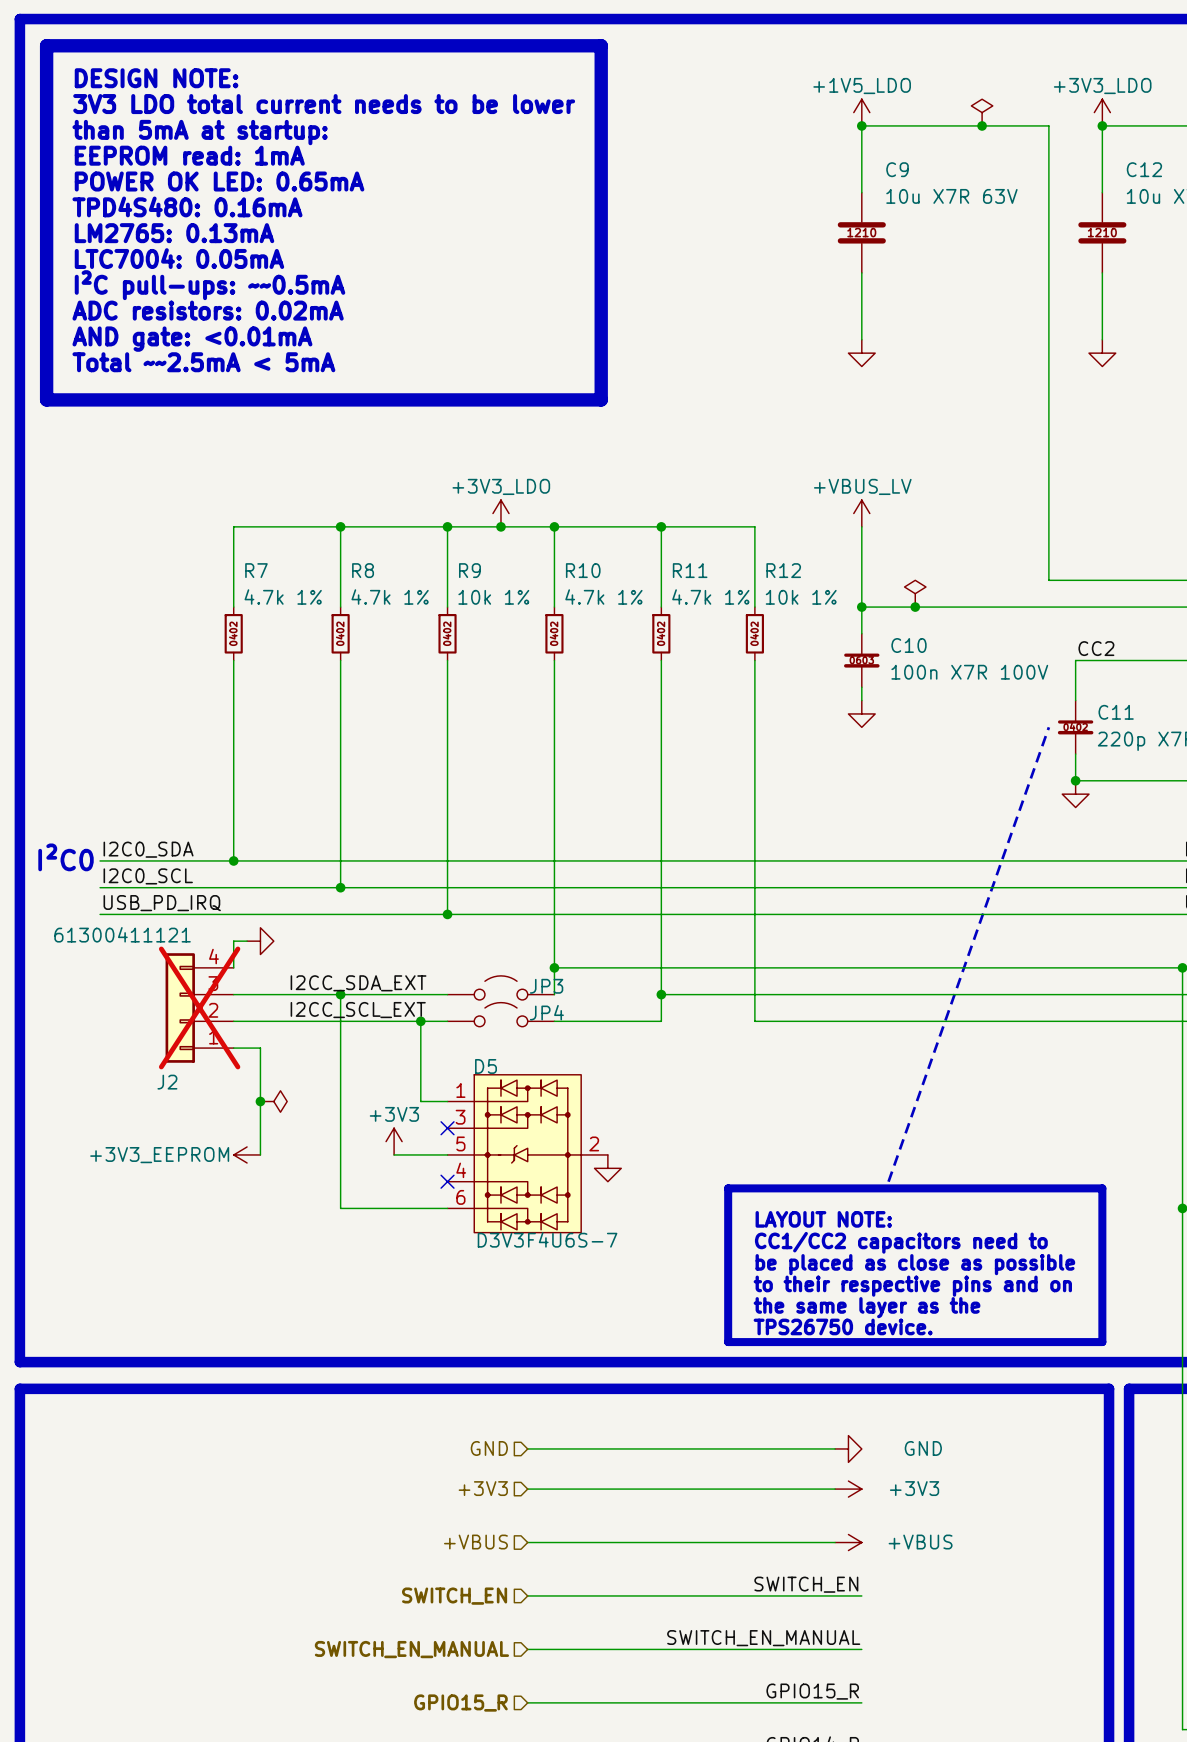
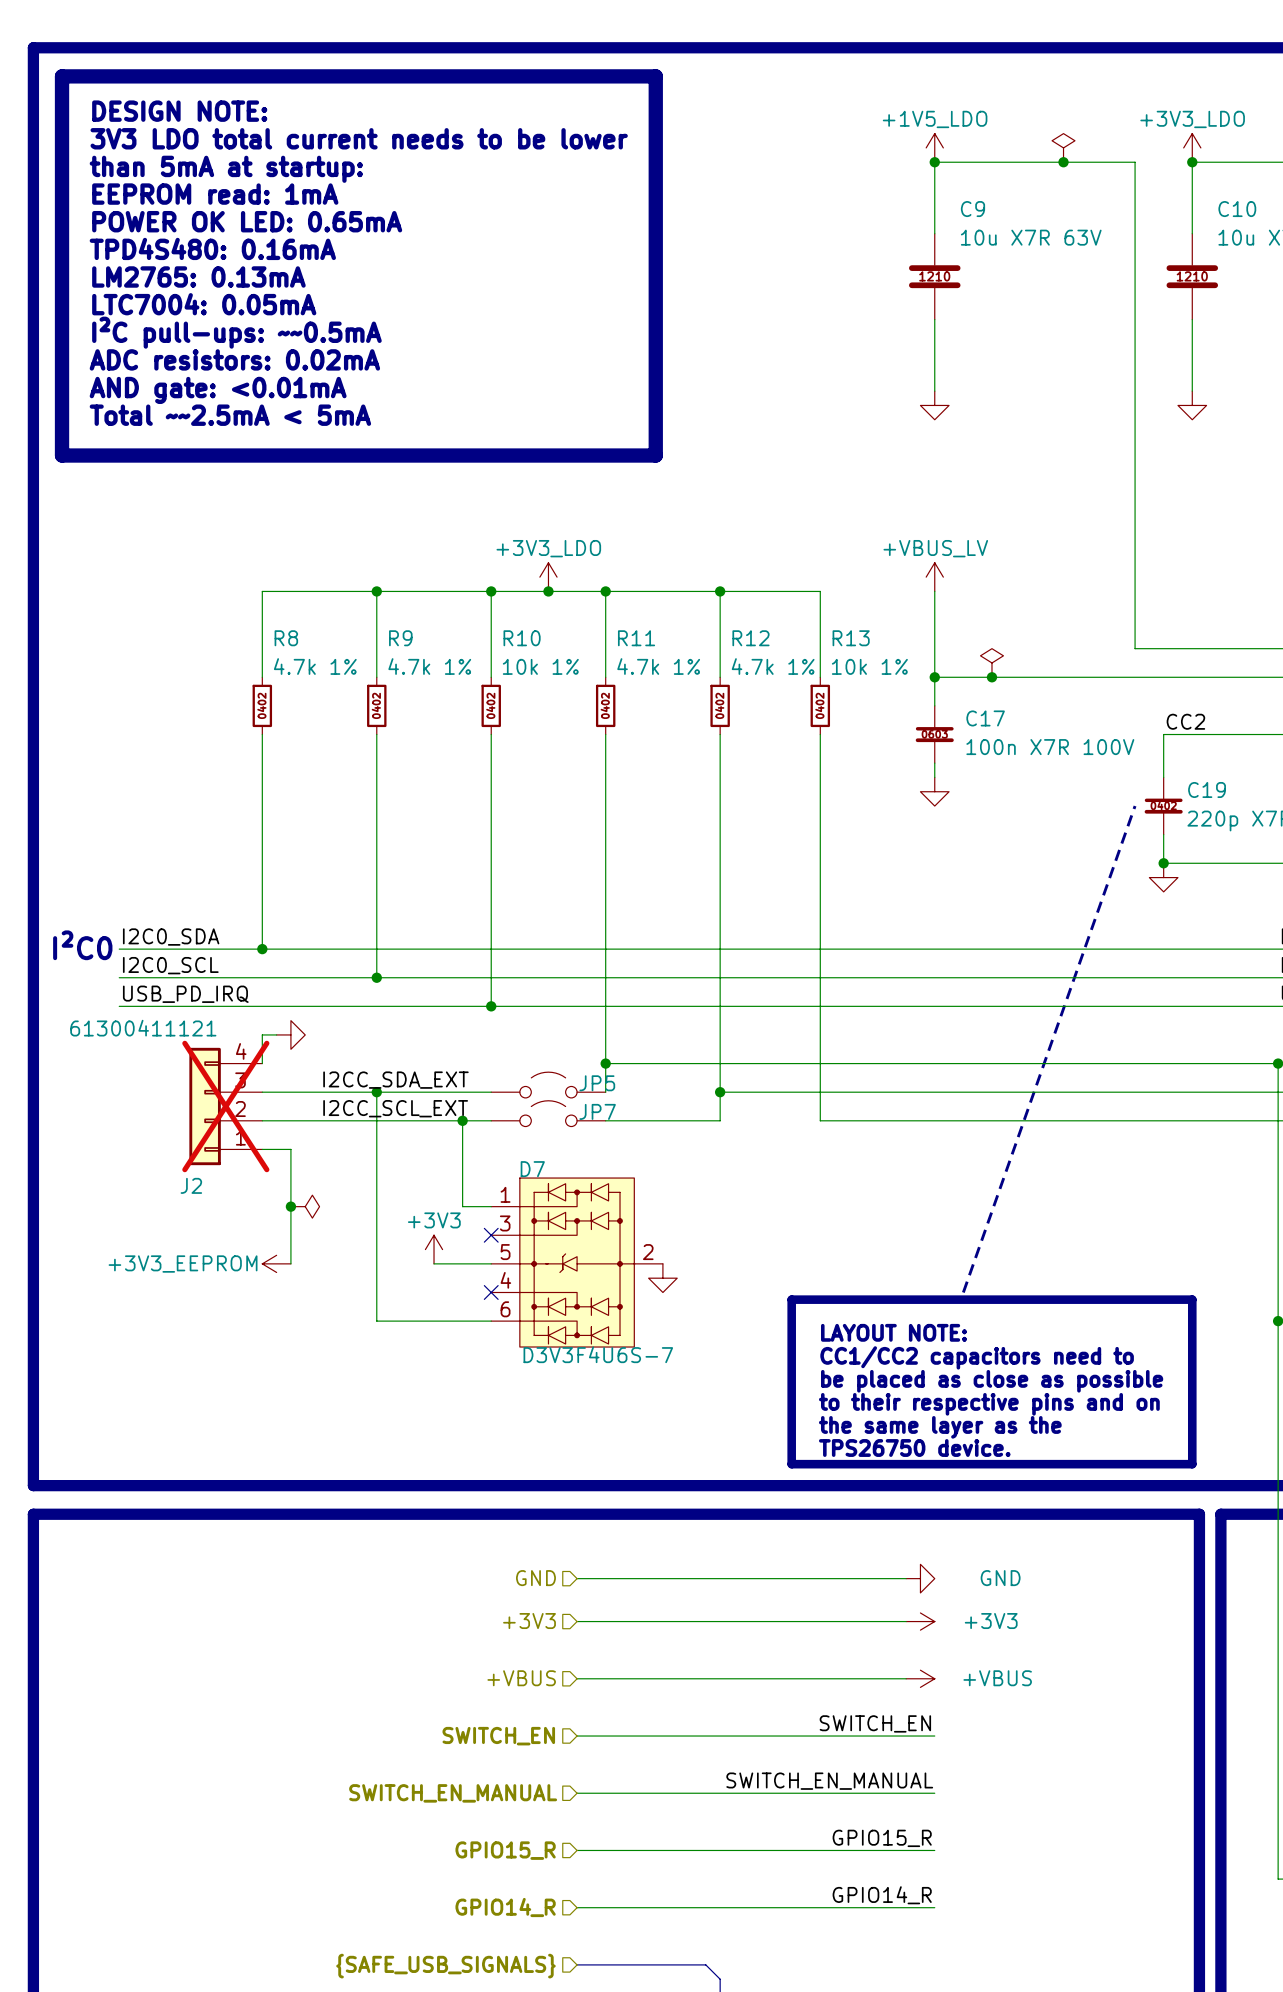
C12 name: C12 (1144, 169) -> C10 (1237, 209)
R7 name: R7 (256, 570) -> R8 (286, 638)
R8 name: R8 (363, 570) -> R9 (400, 638)
R9 name: R9 (469, 570) -> R10 (522, 638)
R10 name: R10 (583, 570) -> R11 (636, 638)
R11 name: R11 (690, 570) -> R12 (750, 638)
R12 name: R12 (783, 570) -> R13 (851, 638)
C10 name: C10 (909, 645) -> C17 (985, 718)
C11 name: C11 (1116, 712) -> C19 (1207, 789)
JP3 name: JP3 (546, 986) -> JP5 (597, 1083)
JP4 name: JP4 (546, 1012) -> JP7 (597, 1111)
D5 name: D5 (486, 1066) -> D7 (532, 1169)

